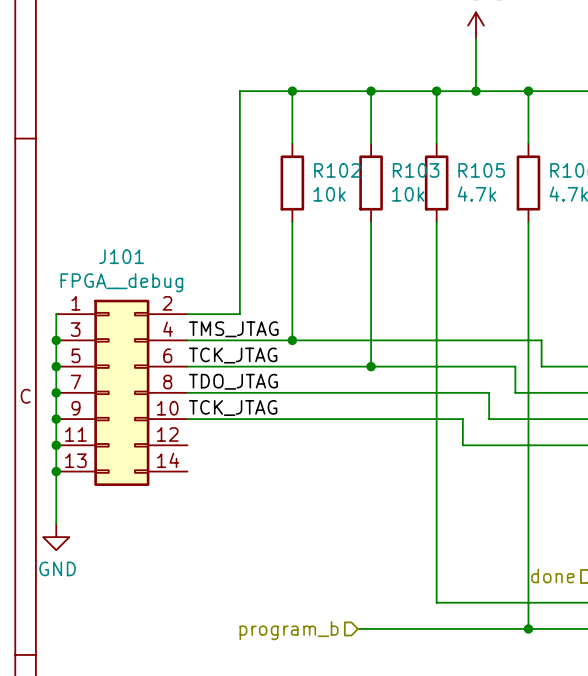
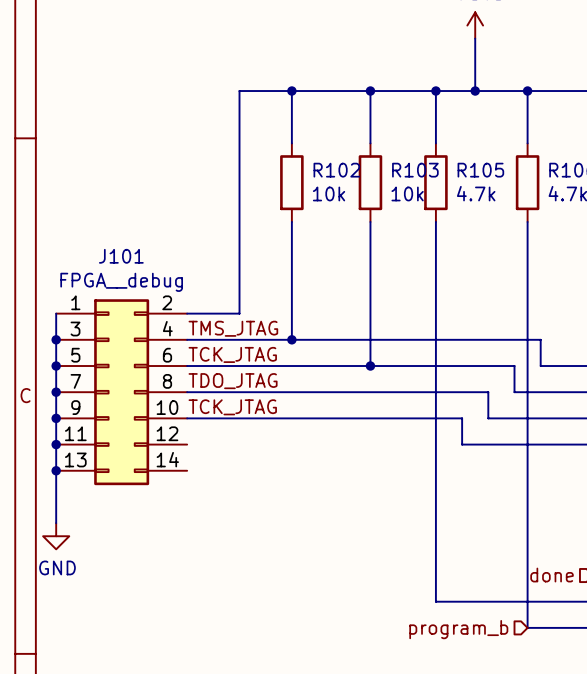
wire: (357, 628) (528, 628) -> none
junction: (528, 628) -> none
hierarchical label position: program_b (289, 630) -> program_b (458, 629)

